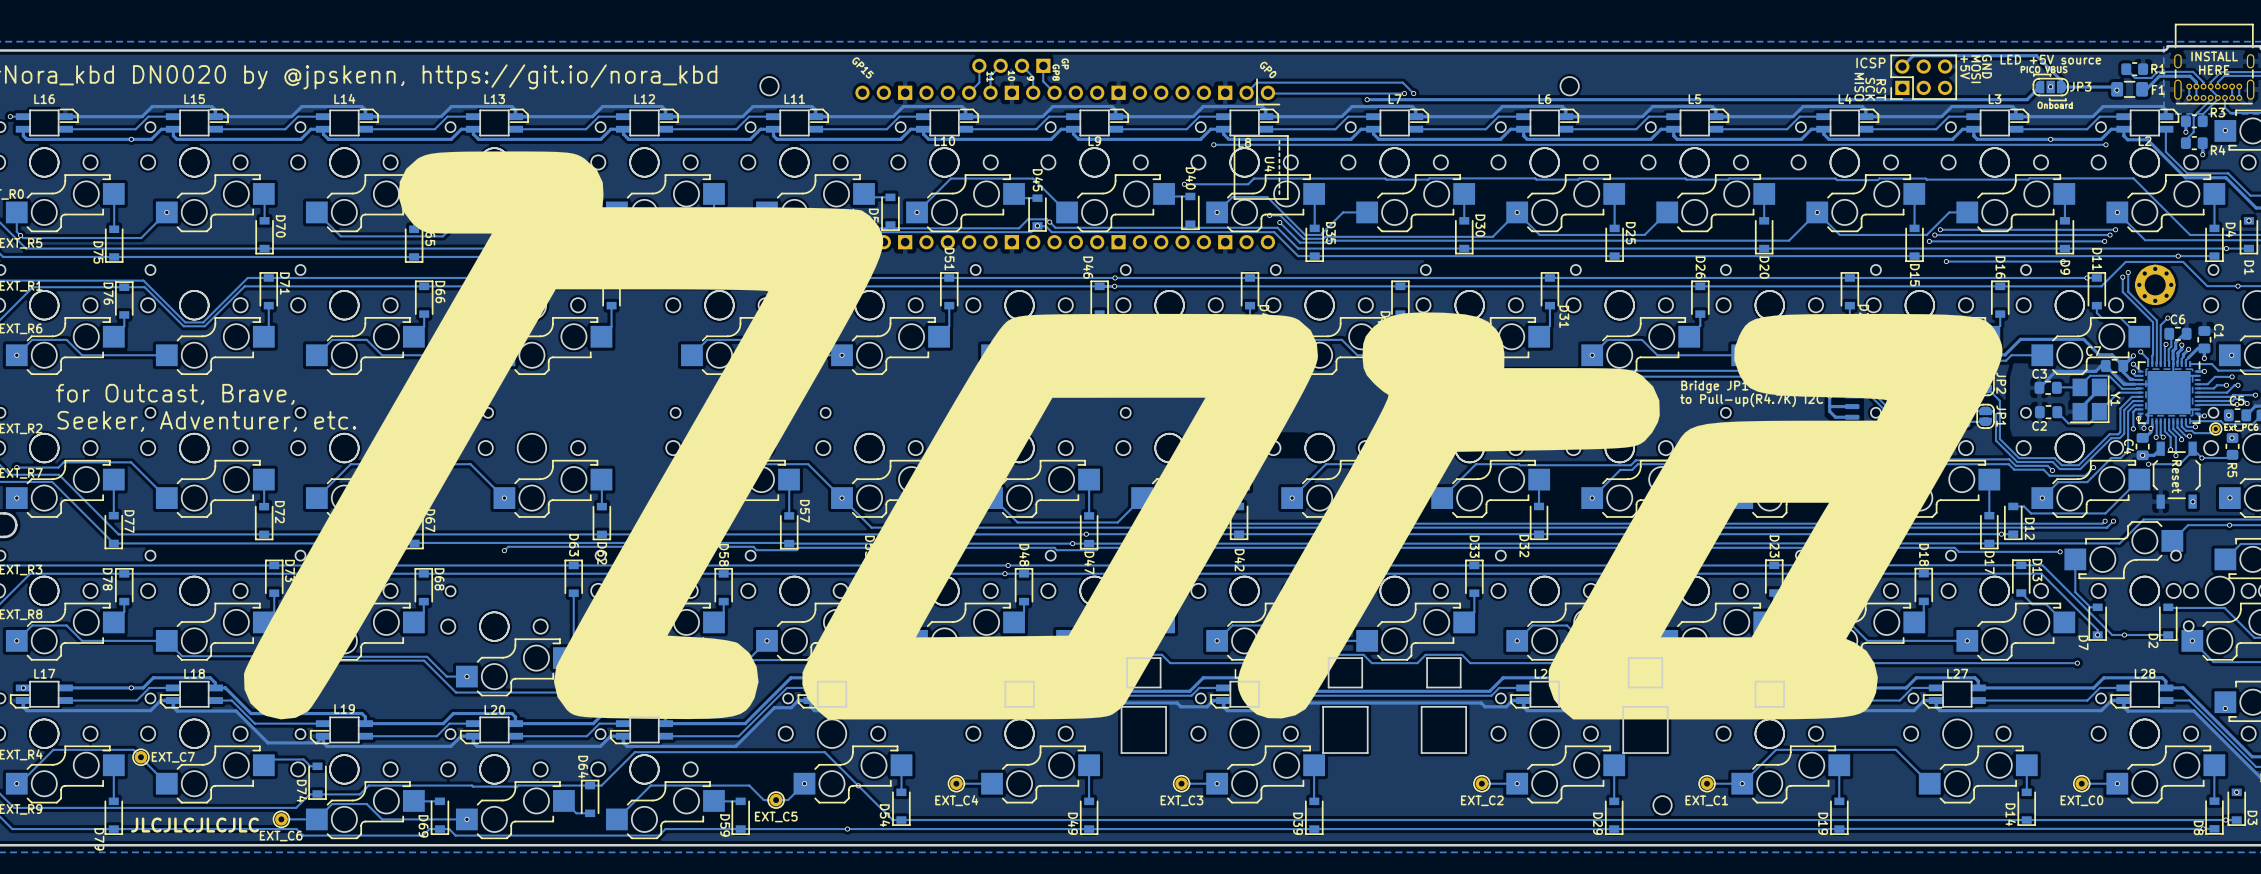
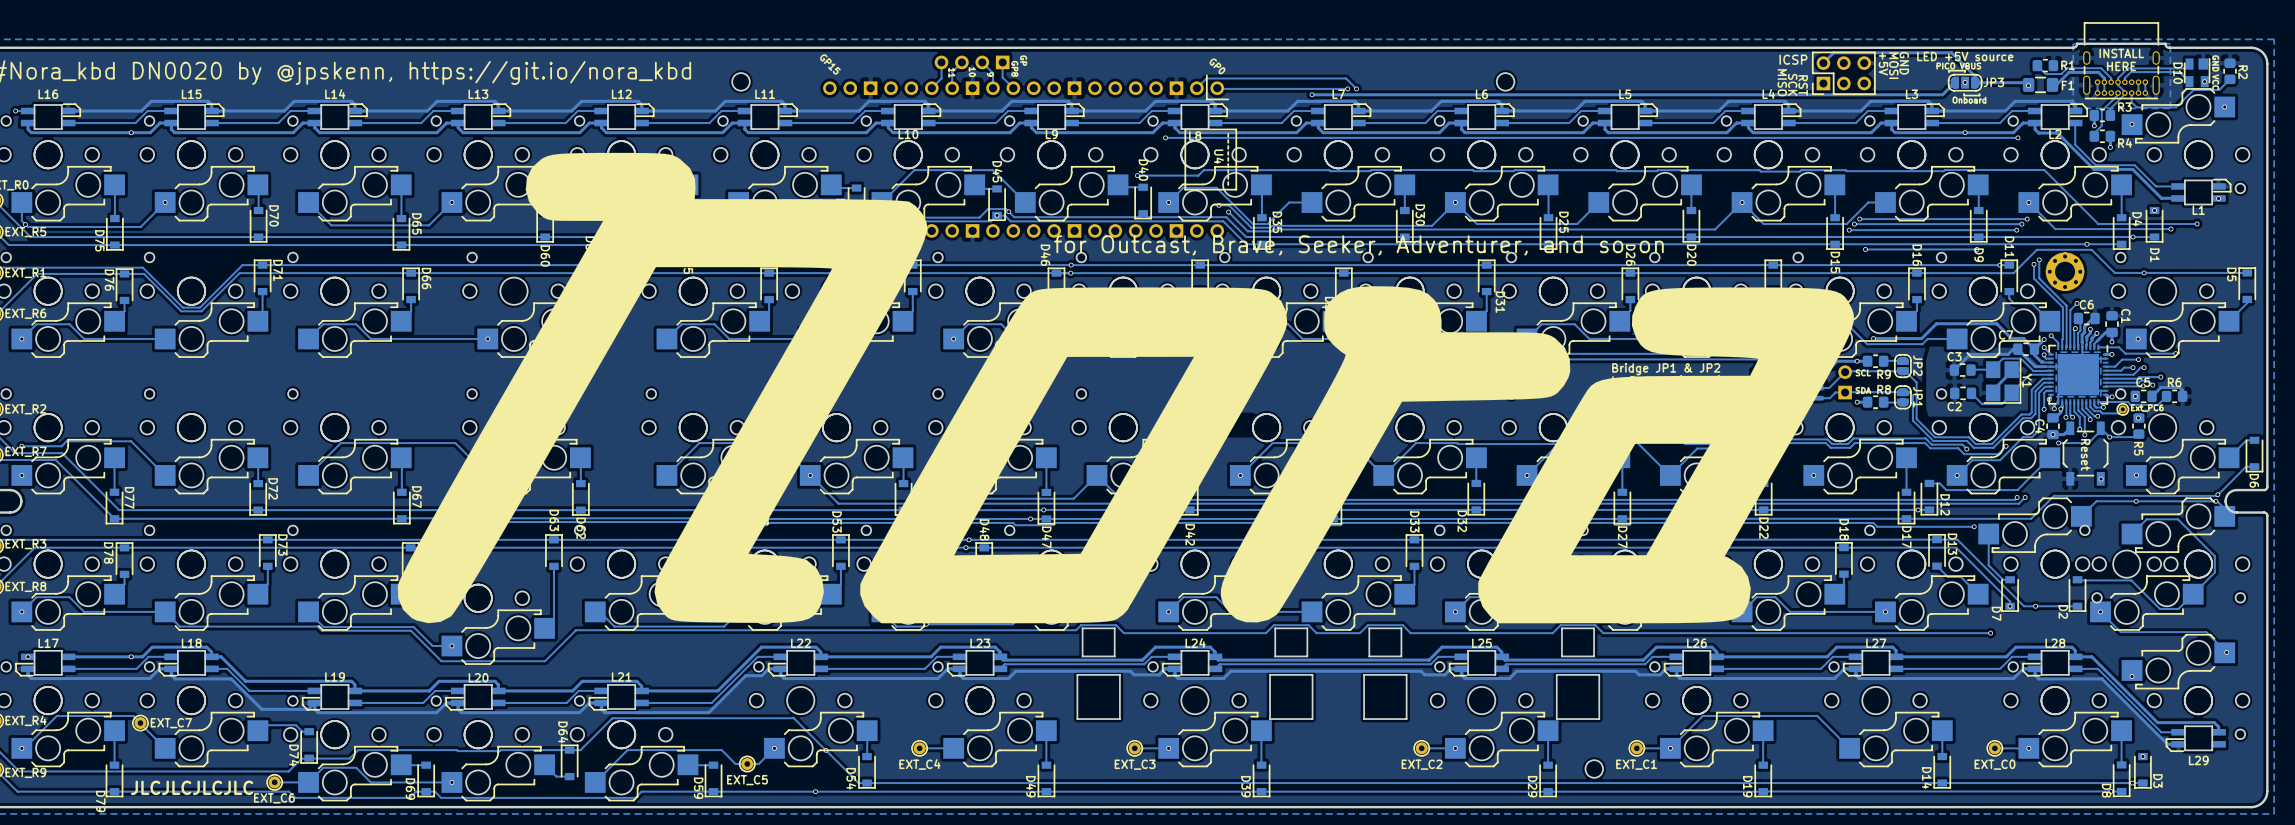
drawing: [243, 151, 2003, 720] -> none
drawing: none -> [397, 152, 1855, 624]
text: none -> for Outcast, Brave, Seeker, Adventurer, and so on (1358, 245)
text: for Outcast, Brave, (175, 394) -> none
text: Seeker, Adventurer, etc. (206, 421) -> none

